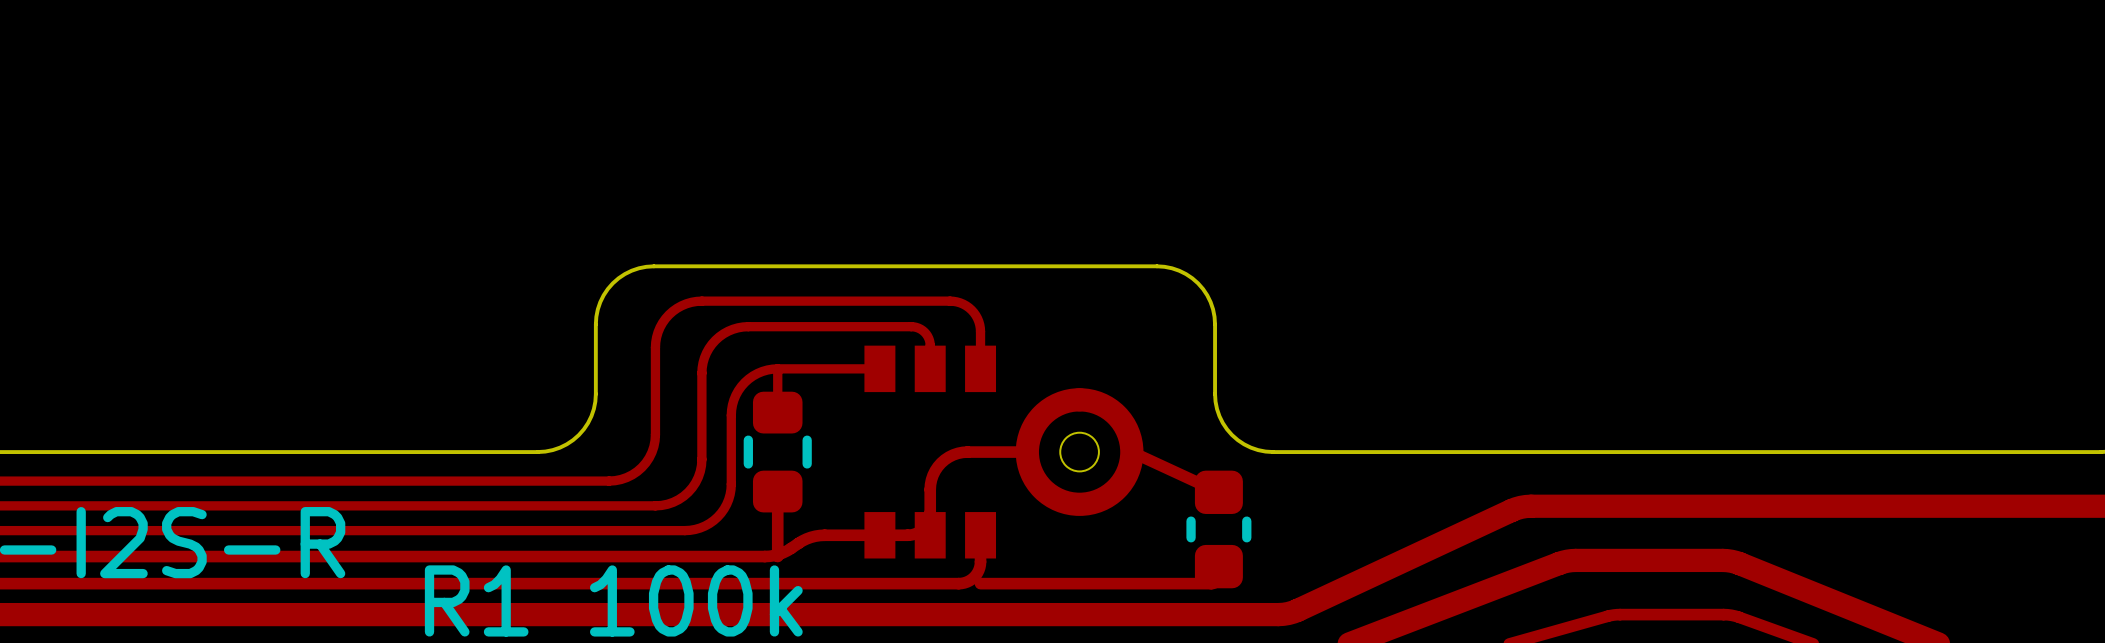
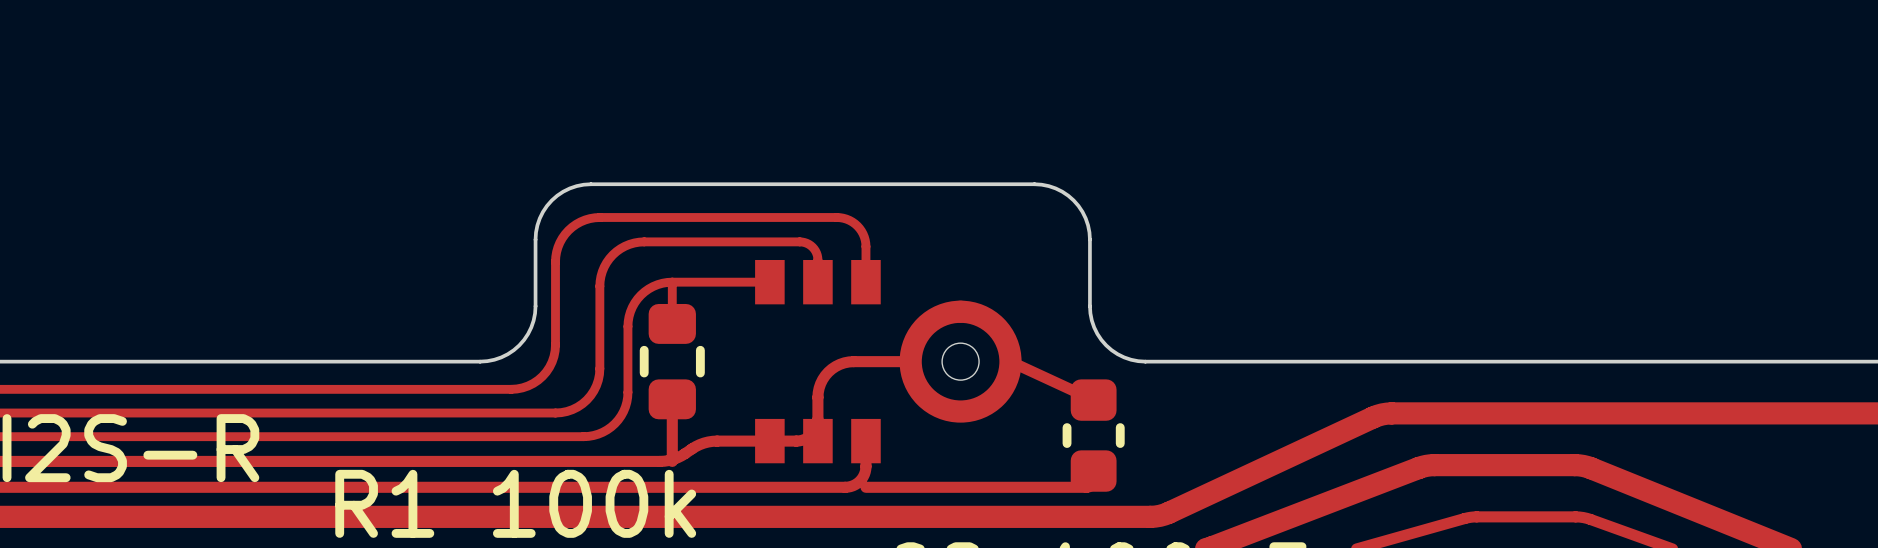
board edge: (692, 266) (638, 268) (624, 274) (607, 289) (600, 302) (596, 316) (595, 394) (591, 416) (583, 429) (566, 444) (552, 450) (537, 452) -> (590, 184) (569, 188) (557, 195) (547, 205) (539, 218) (535, 239) (535, 313) (531, 327) (524, 339) (513, 350) (494, 359) (443, 361)

